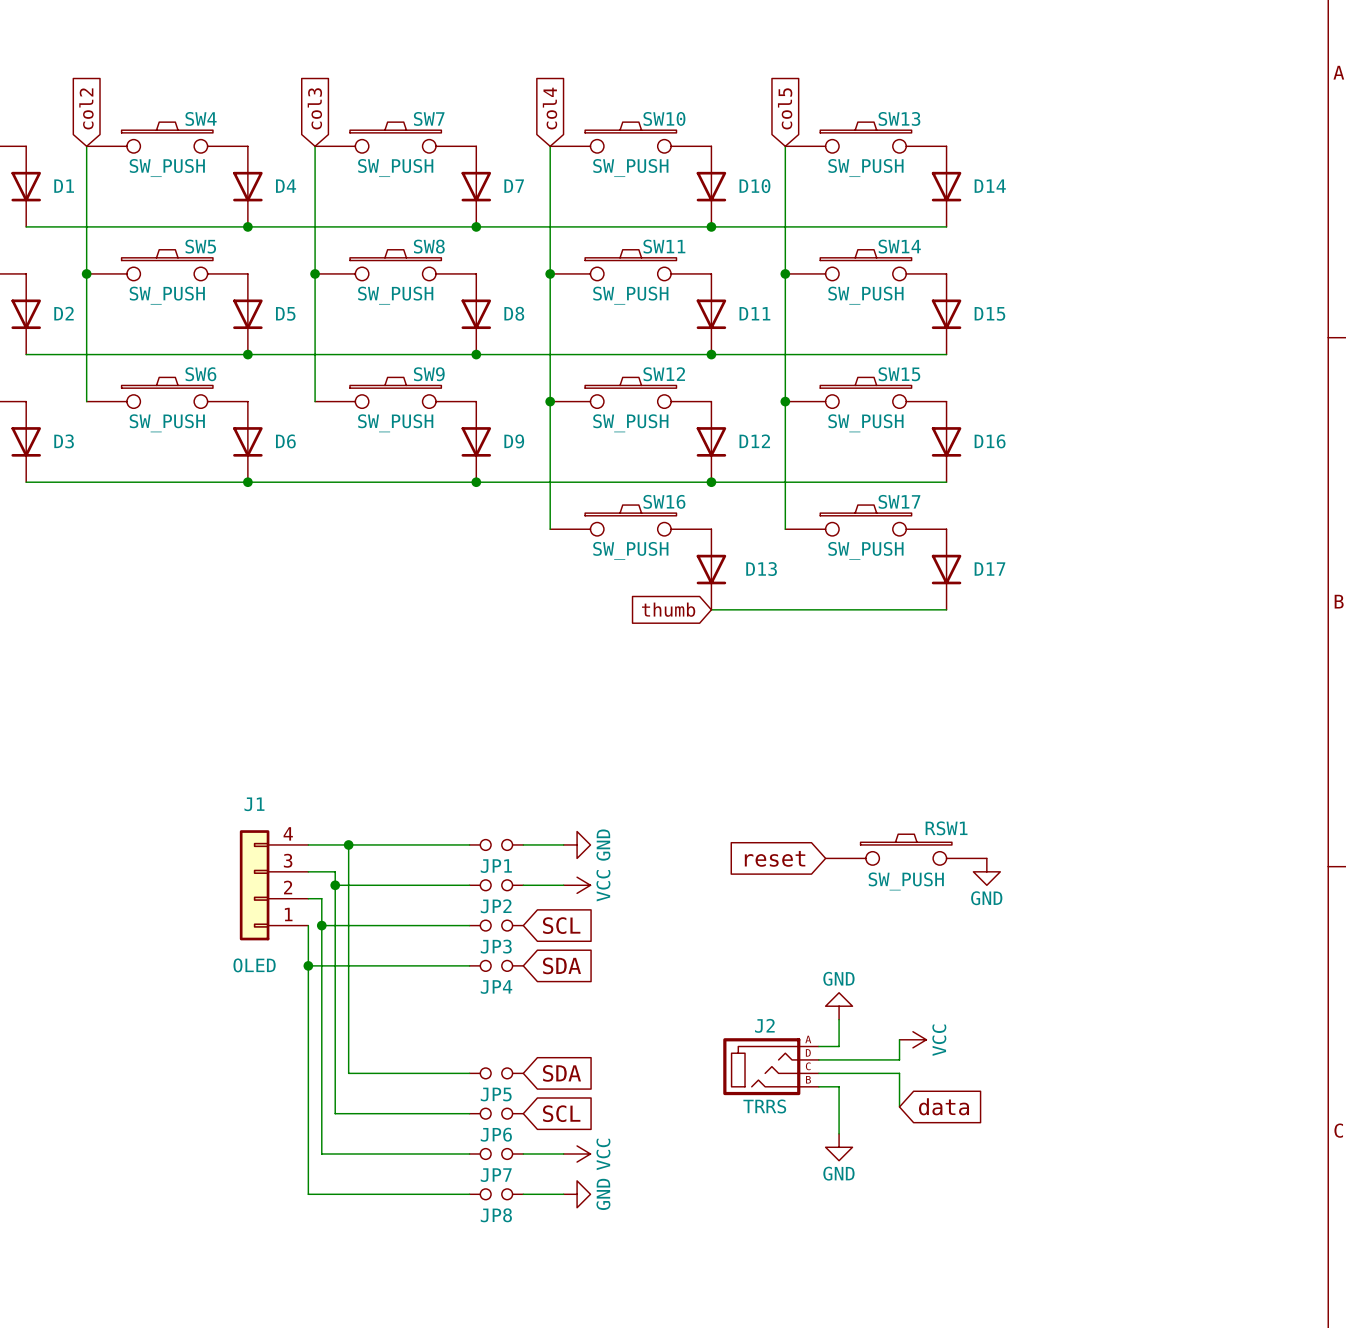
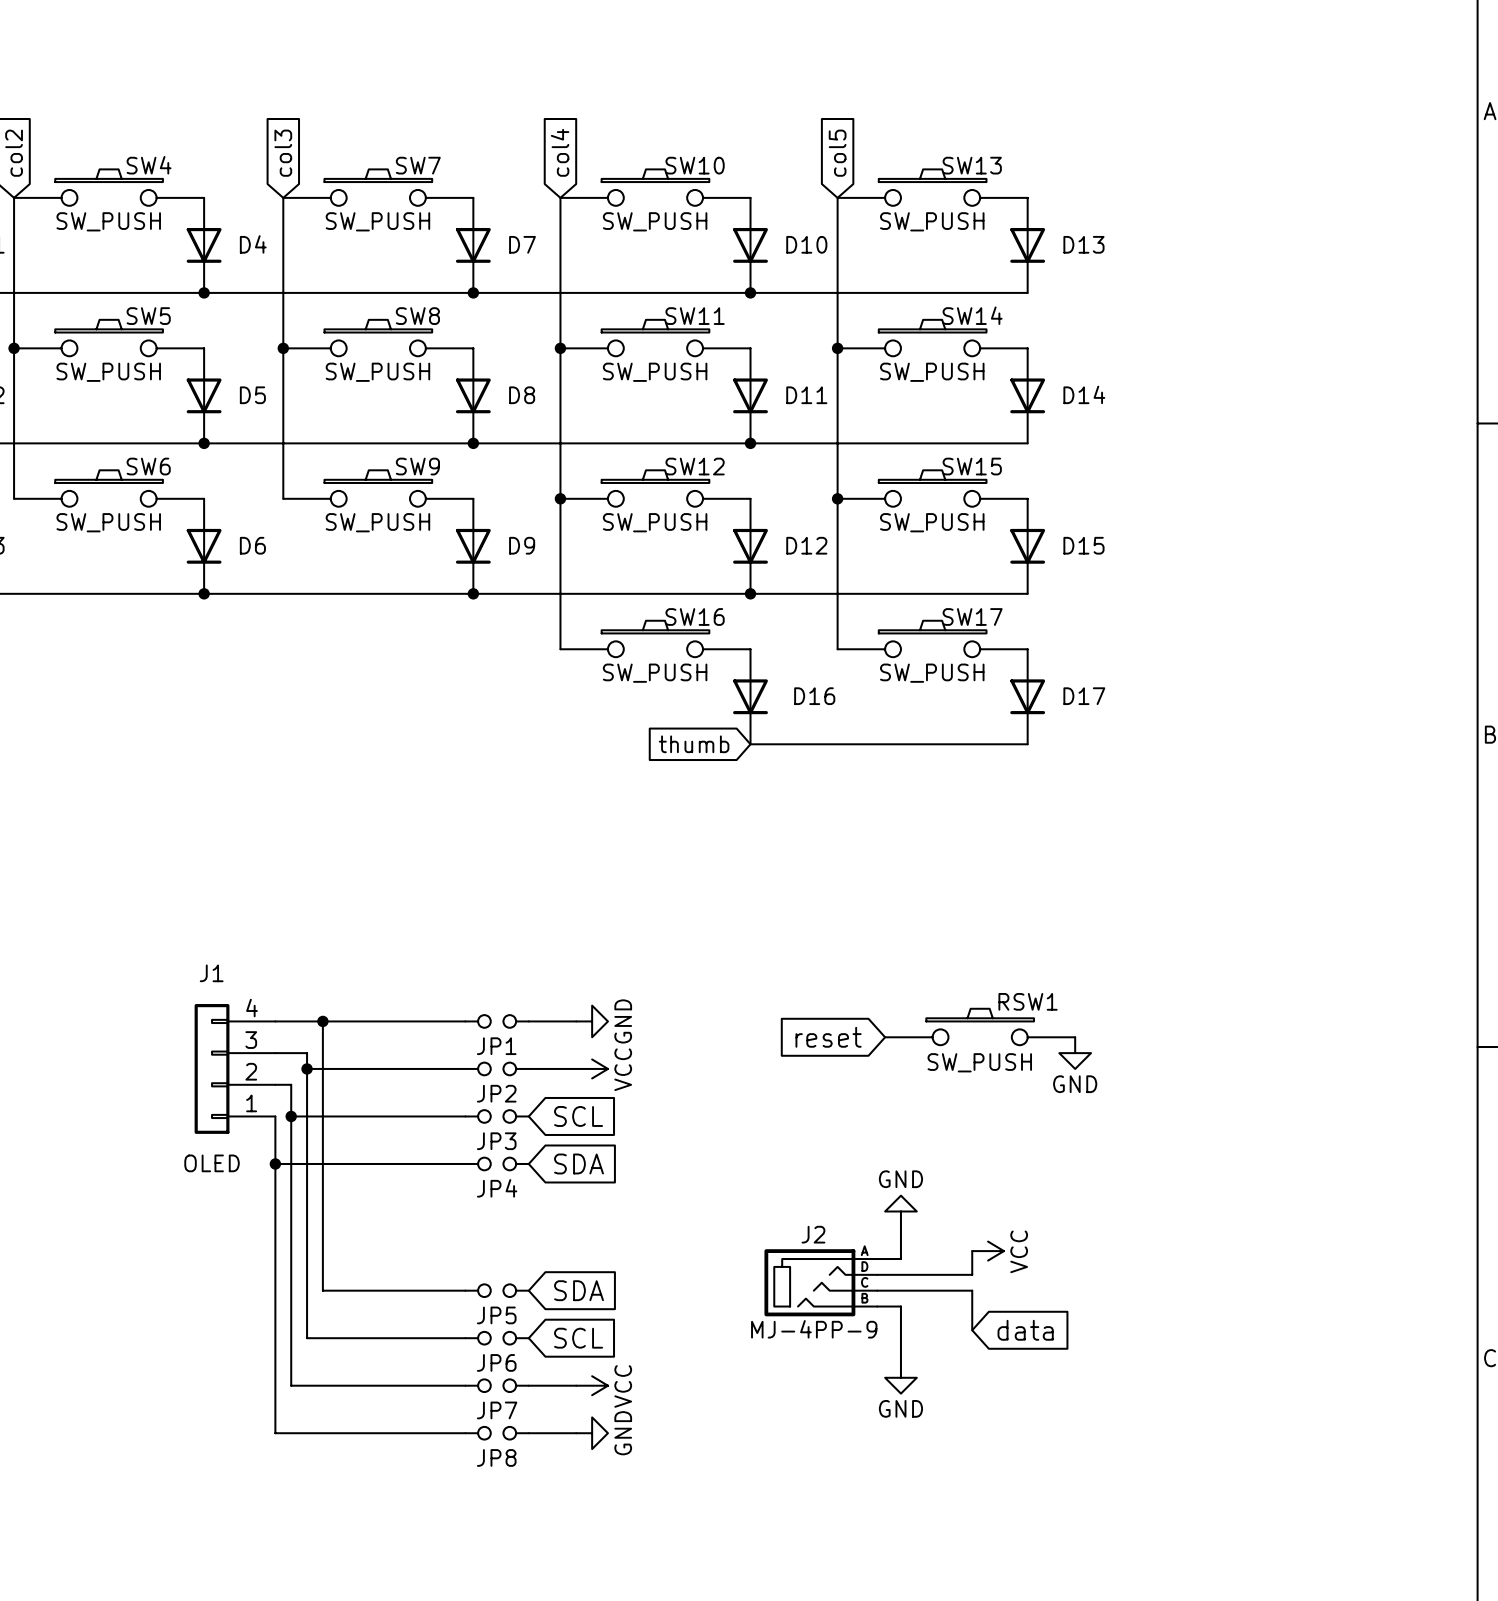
D14 name: D14 (990, 186) -> D13 (1083, 244)
D15 name: D15 (989, 313) -> D14 (1084, 394)
D16 name: D16 (990, 441) -> D15 (1083, 545)
D13 name: D13 (761, 569) -> D16 (814, 696)
J2 value: TRRS (764, 1106) -> MJ-4PP-9 (814, 1329)

